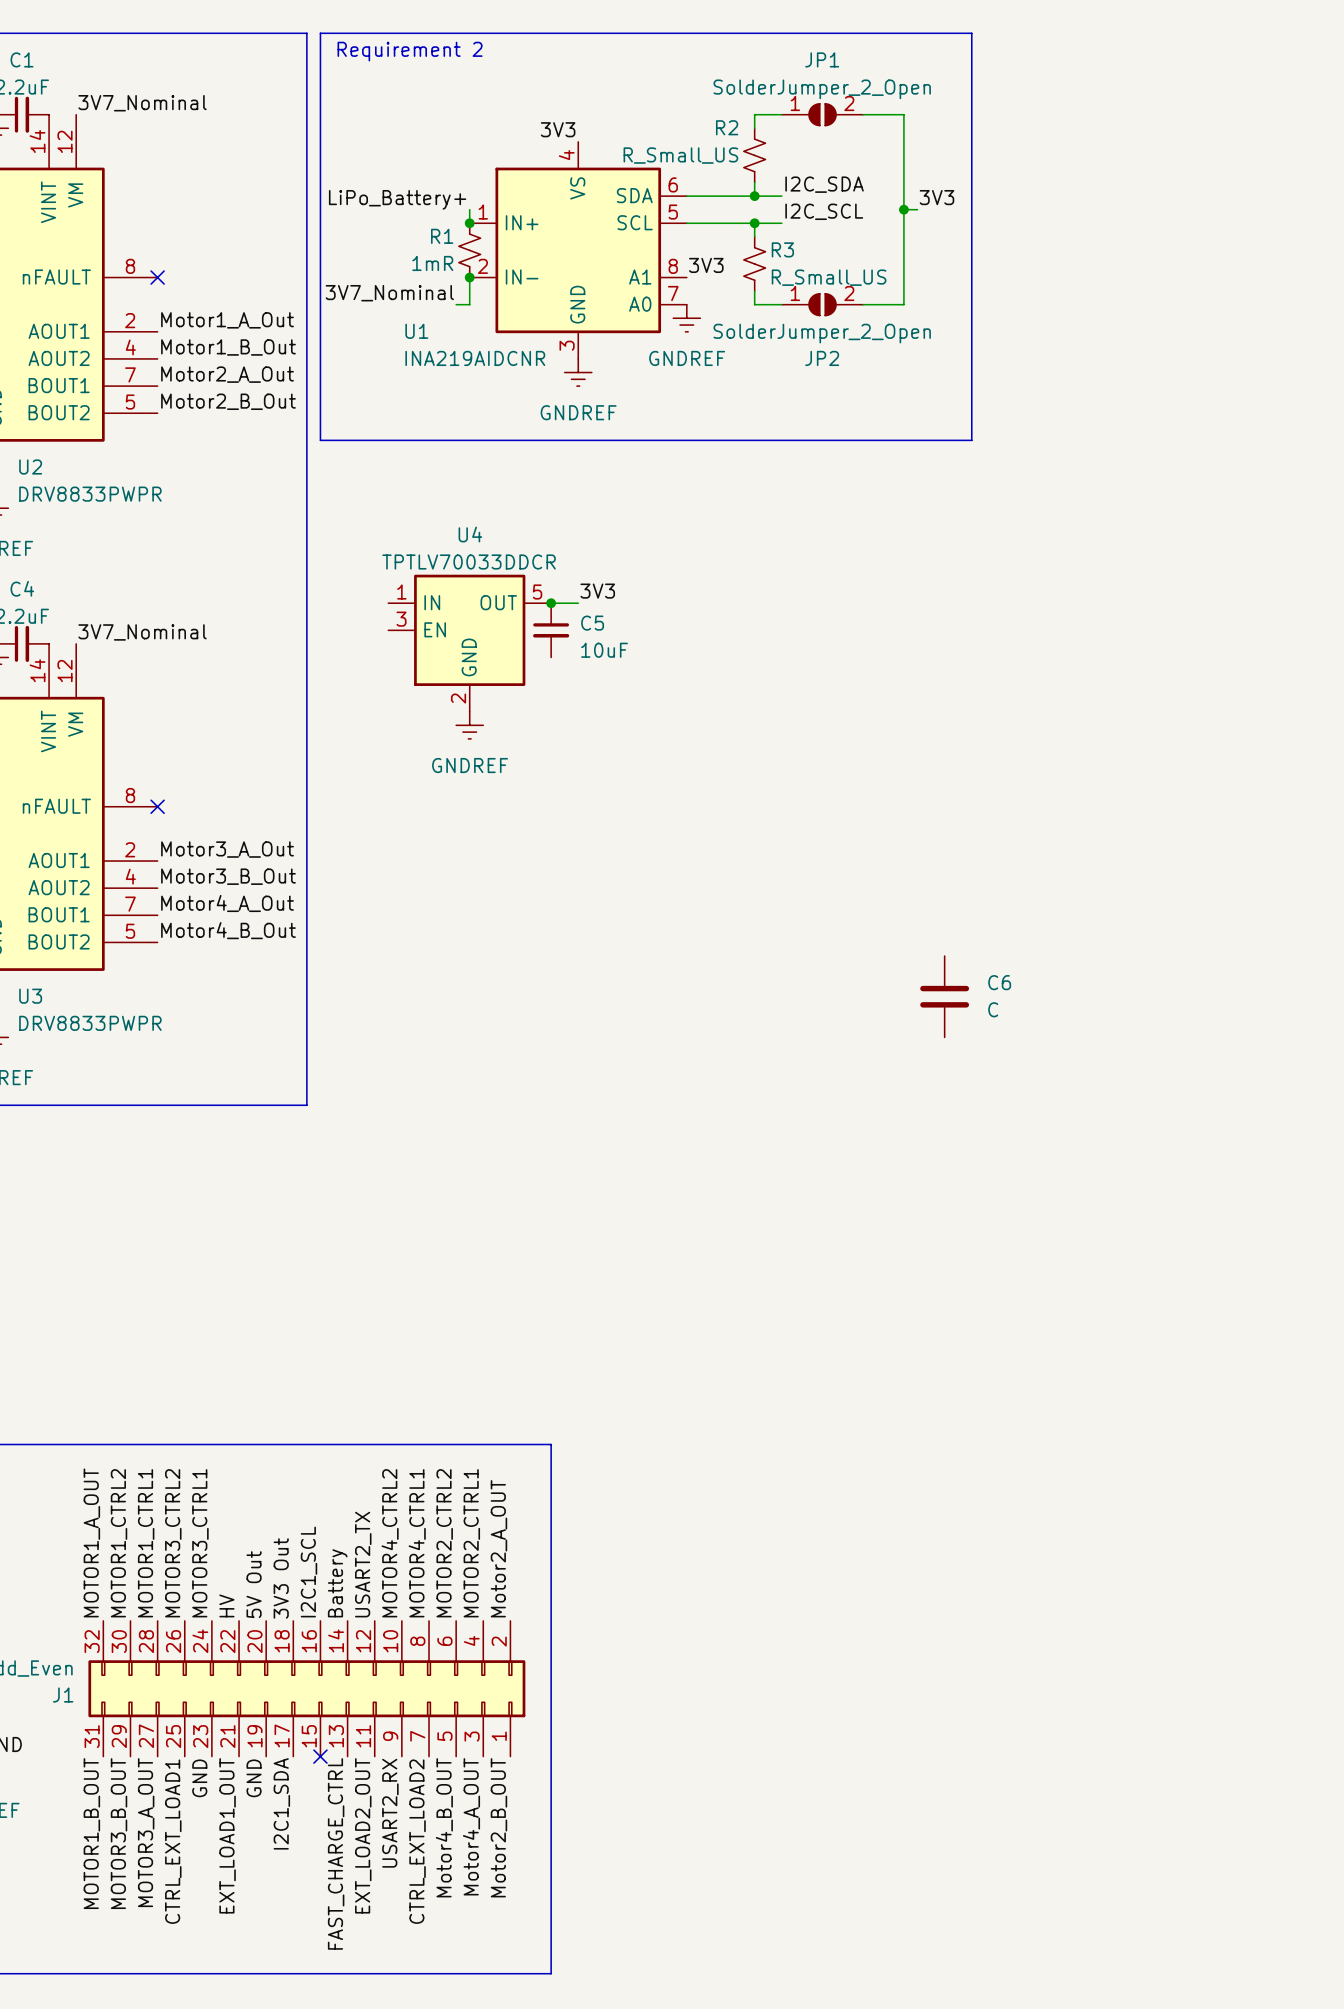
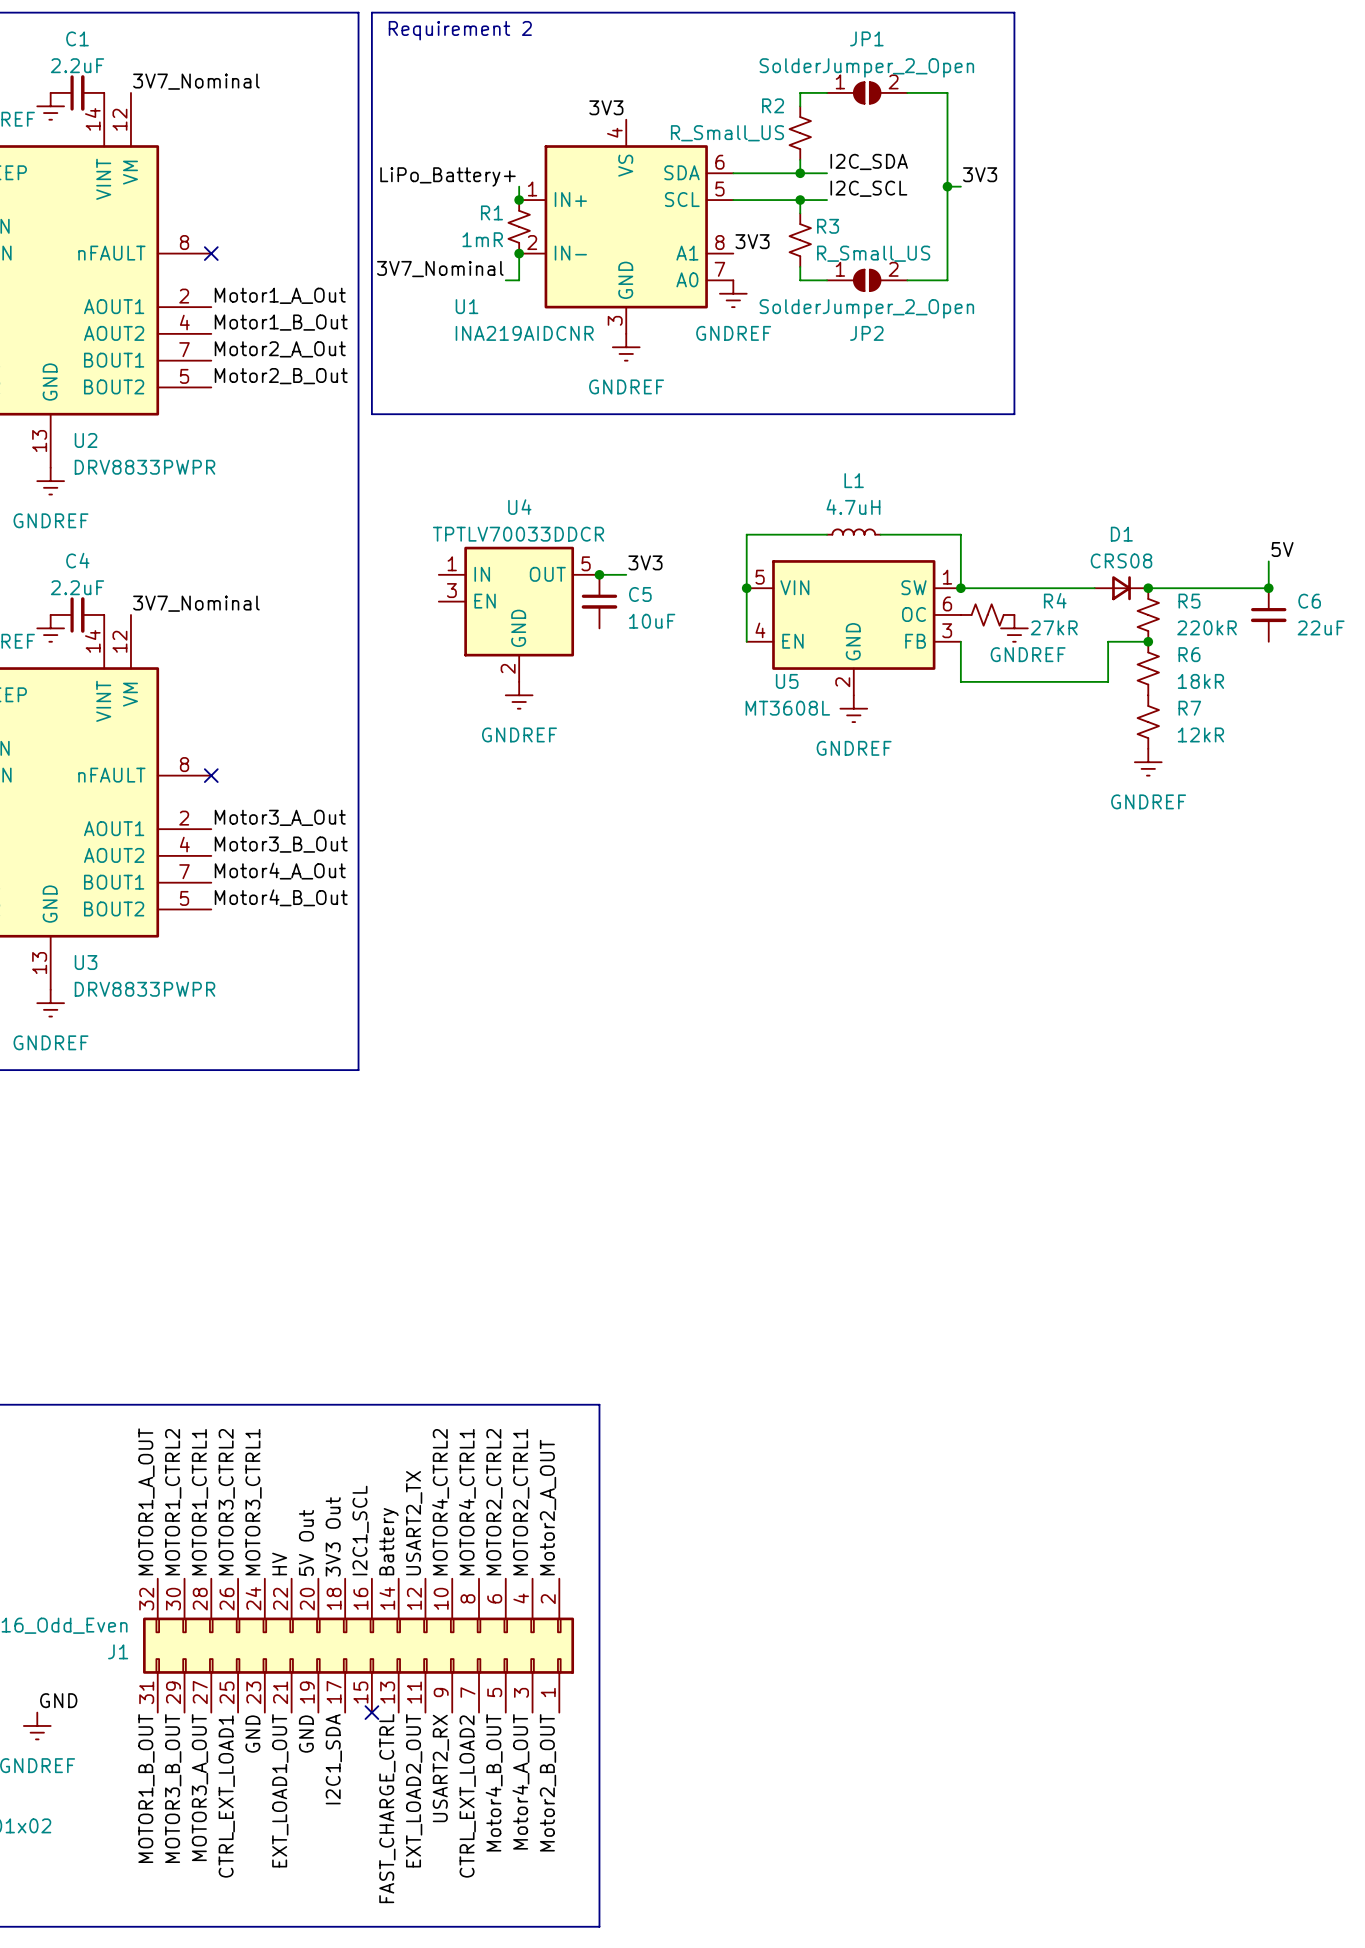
L1: none -> 4.7uH (853, 532)
wire: none -> (827, 534) (746, 534) (746, 641)
wire: none -> (880, 534) (960, 534) (960, 588) (1094, 588)
label: none -> 5V (1282, 549)
wire: none -> (1268, 561) (1268, 588) (1148, 588)
junction: none -> (746, 588)
junction: none -> (960, 588)
D1: none -> CRS08 (1121, 588)
junction: none -> (1148, 588)
junction: none -> (1268, 588)
R4: none -> 27kR (987, 614)
R5: none -> 220kR (1148, 614)
U5: none -> MT3608L (853, 627)
power symbol: none -> GNDREF (1014, 628)
wire: none -> (960, 641) (960, 681) (1108, 681) (1108, 641) (1148, 641)
junction: none -> (1148, 641)
R6: none -> 18kR (1148, 668)
power symbol: none -> GNDREF (853, 708)
R7: none -> 12kR (1148, 722)
power symbol: none -> GNDREF (1148, 762)
C6 symbol: [920, 956, 970, 1038] -> [1250, 588, 1287, 642]
C6 value: C (993, 1009) -> 22uF (1321, 627)

